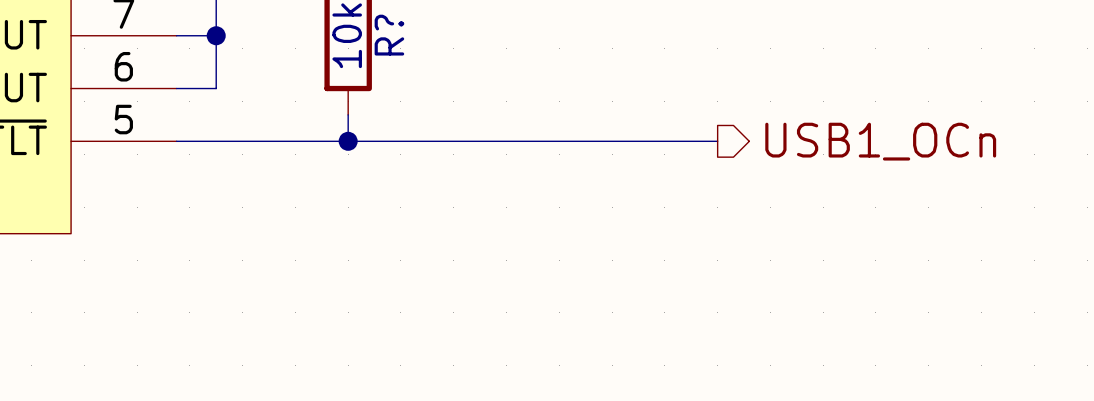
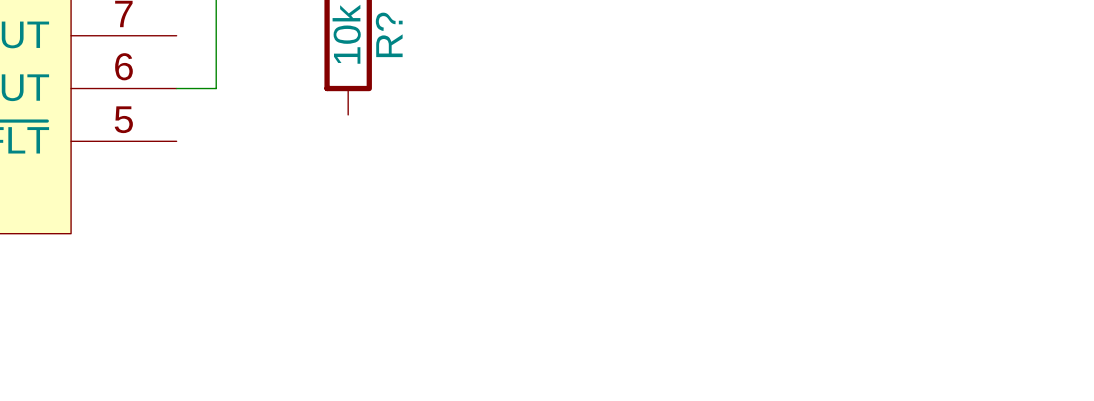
wire: (176, 35) (216, 35) -> none
junction: (216, 35) -> none
wire: (348, 114) (348, 141) -> none
wire: (176, 141) (717, 141) -> none
junction: (348, 141) -> none
hierarchical label: USB1_OCn (880, 141) -> none

